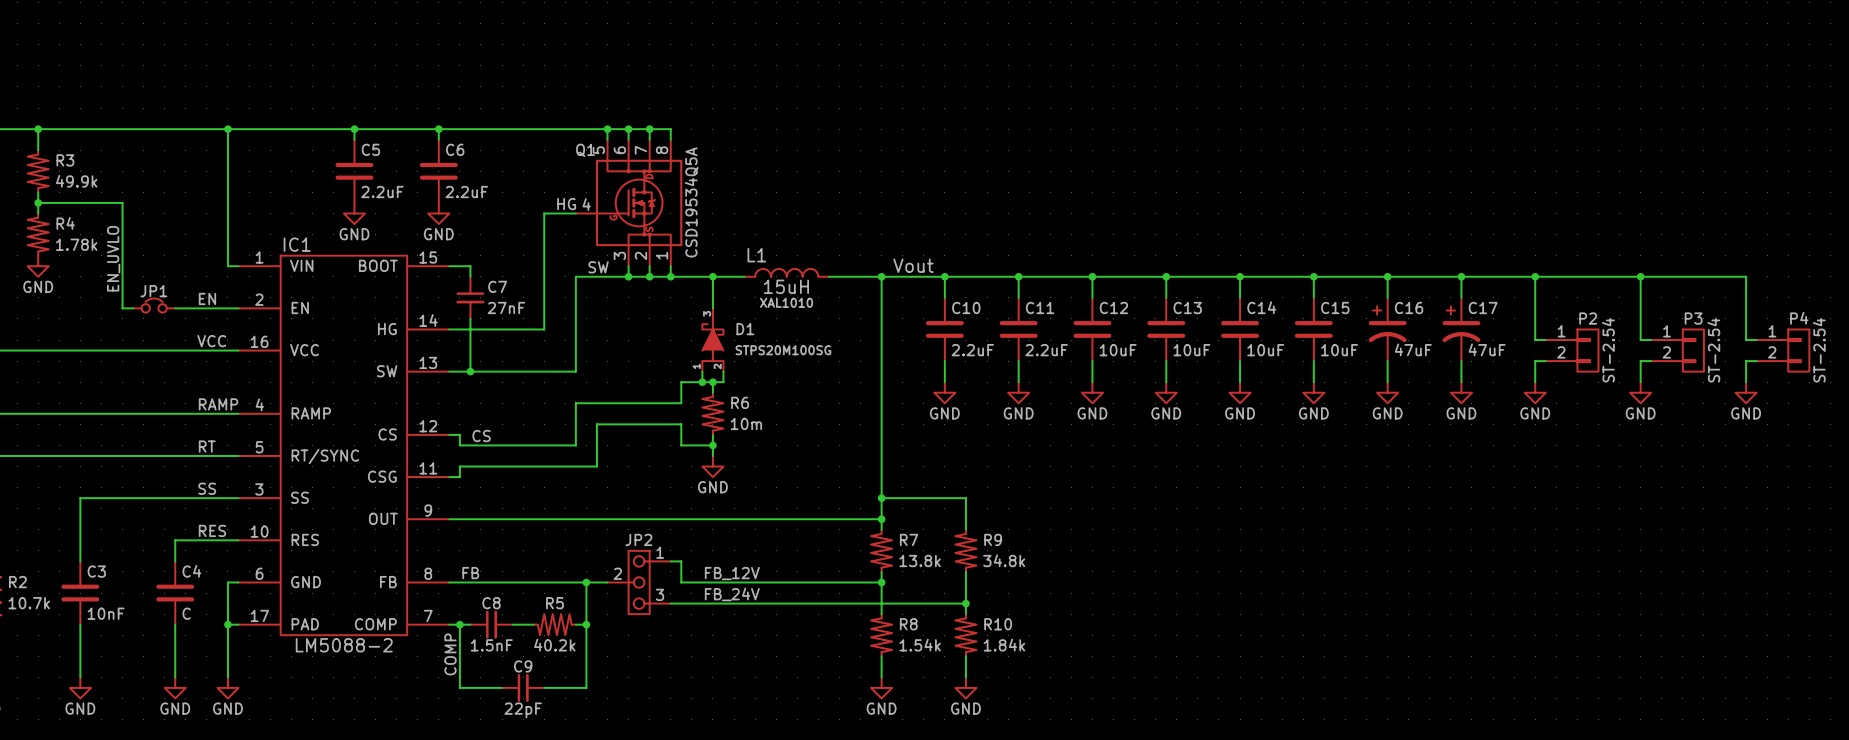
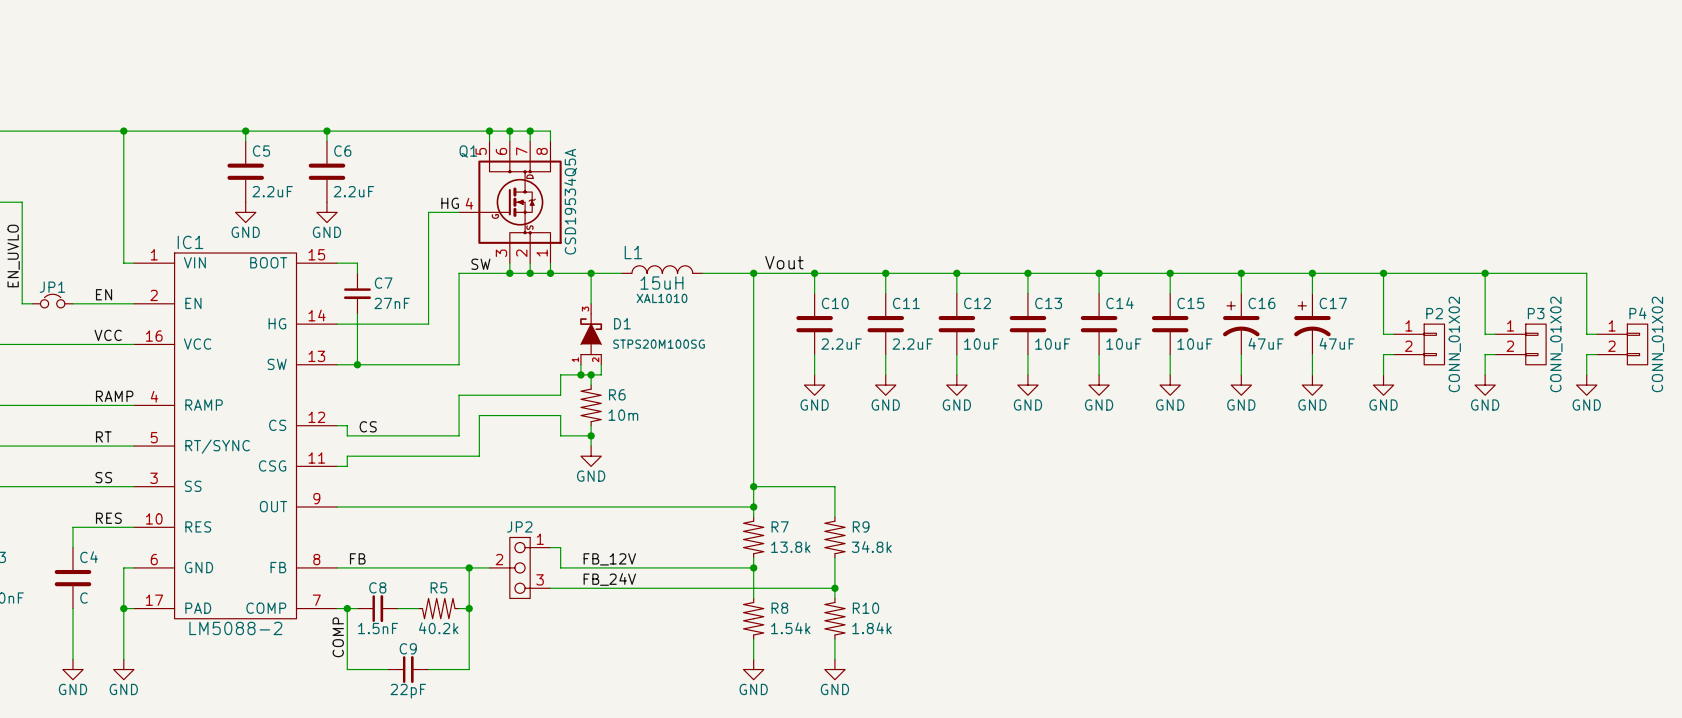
P2 value: ST-2.54 (1608, 350) -> CONN_01X02 (1454, 344)
P3 value: ST-2.54 (1713, 350) -> CONN_01X02 (1556, 344)
P4 value: ST-2.54 (1819, 350) -> CONN_01X02 (1657, 344)

